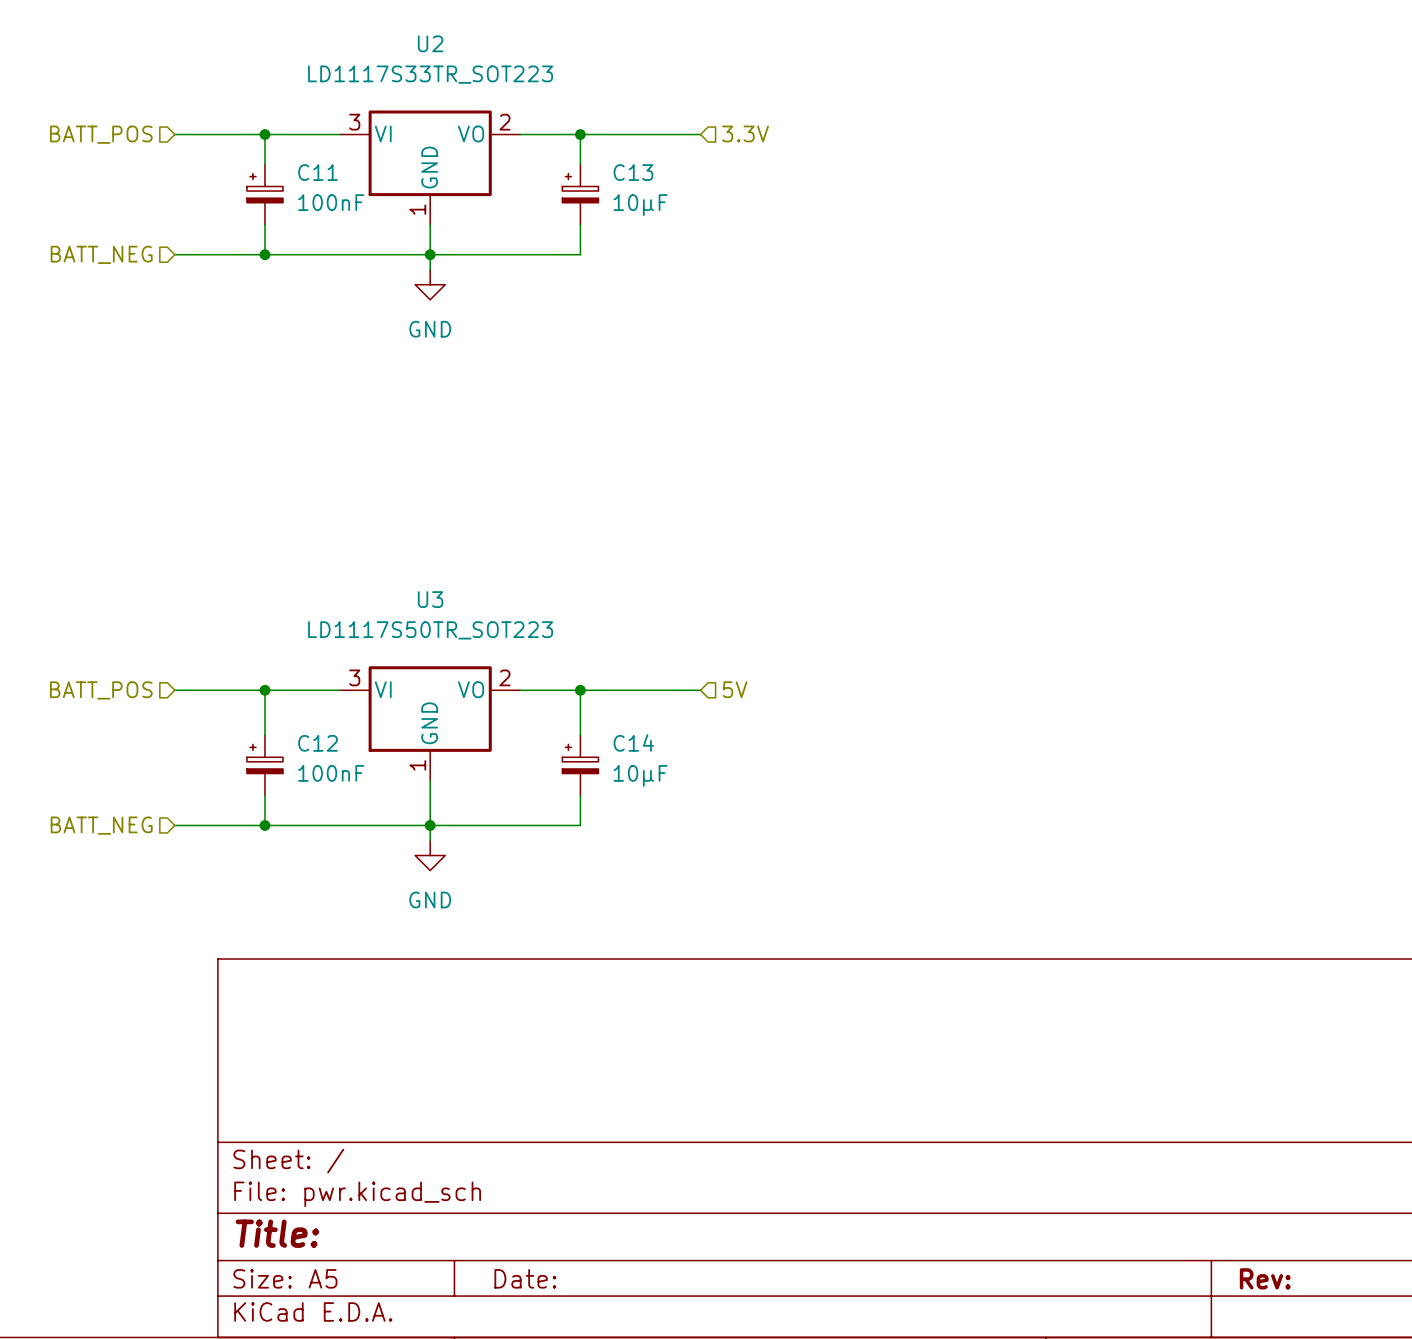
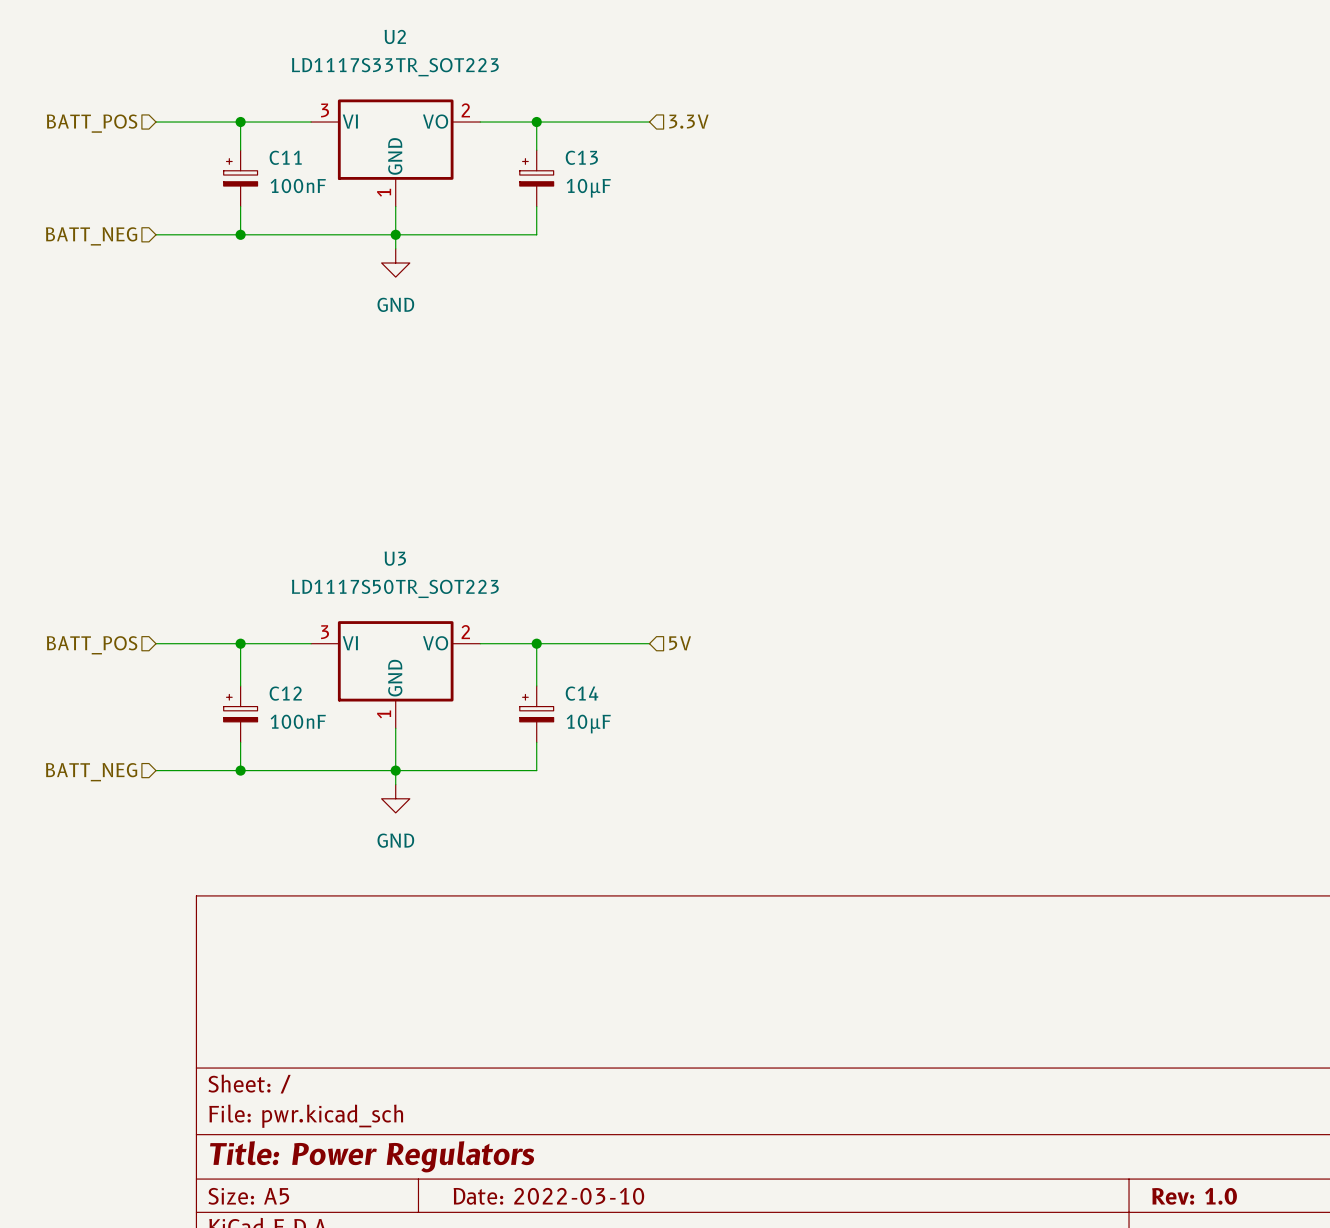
title block: Title: (277, 1233) -> Title: Power Regulators (372, 1156)
title block: Date: (525, 1278) -> Date: 2022-03-10 (548, 1196)
title block: Rev: (1265, 1278) -> Rev: 1.0 (1194, 1196)

